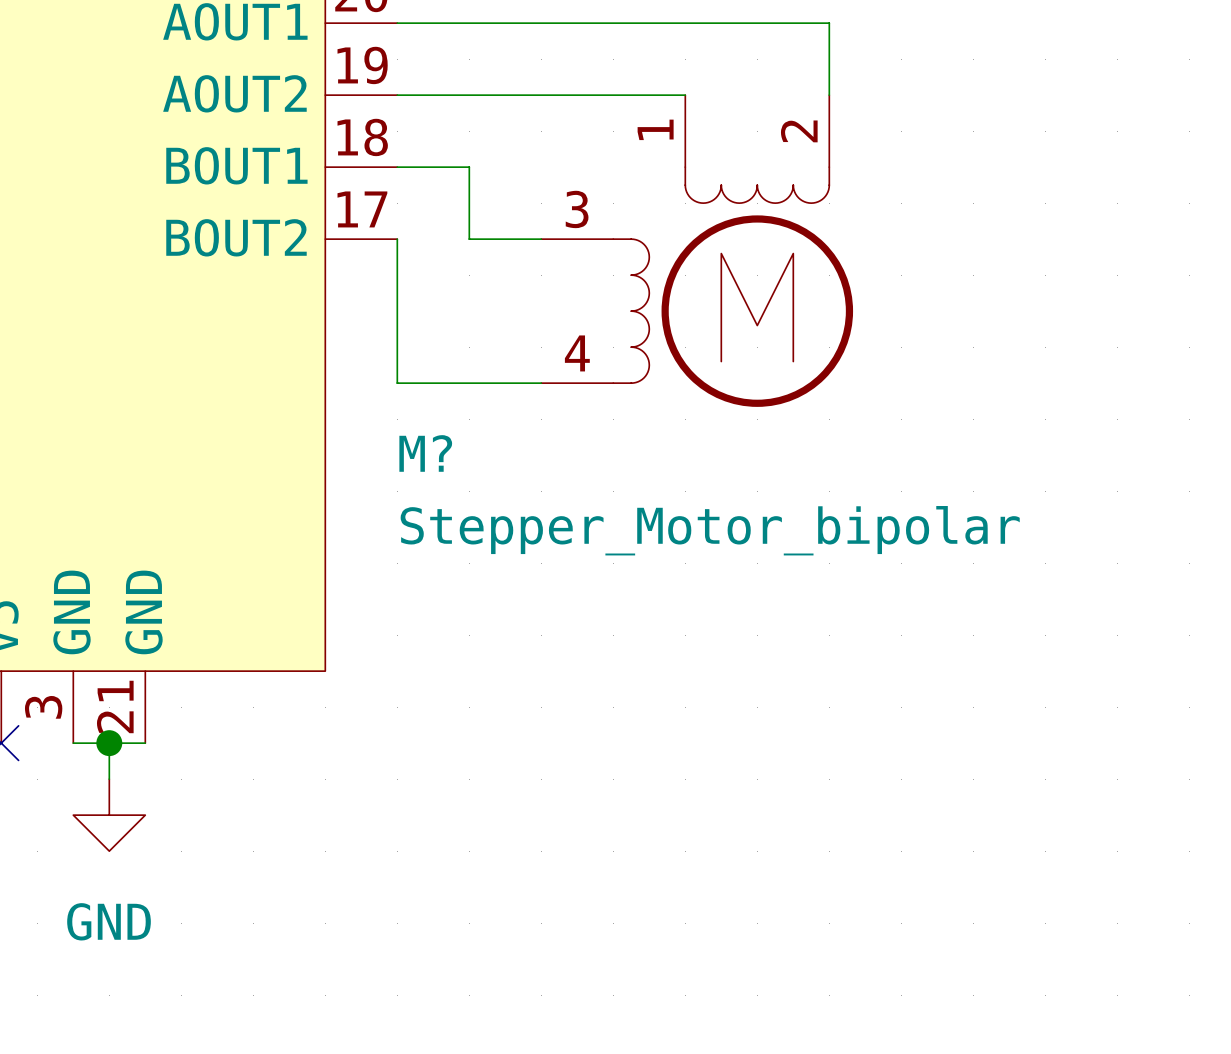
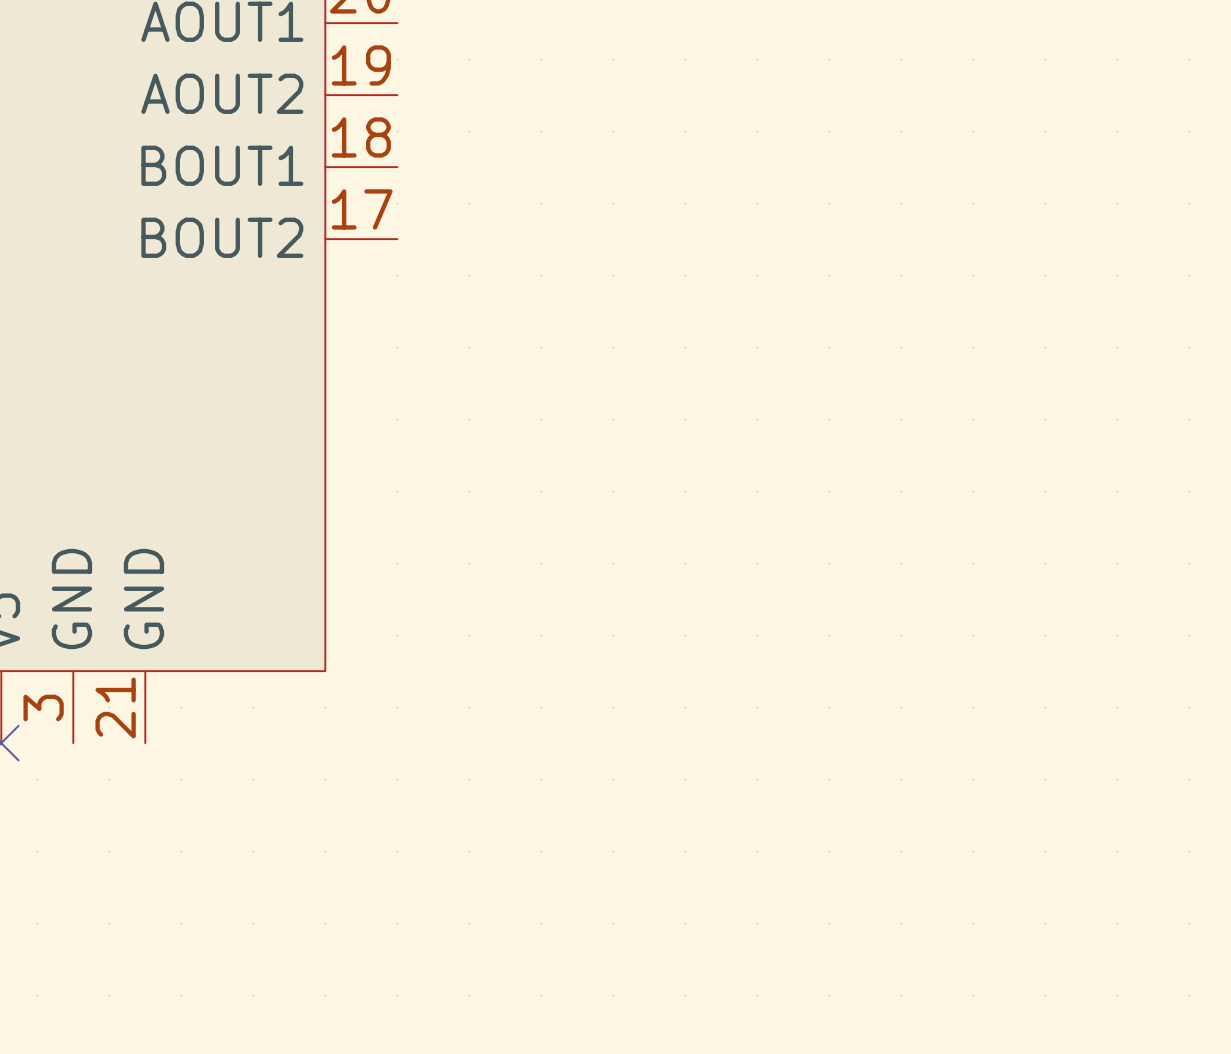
wire: (397, 23) (829, 23) (829, 95) -> none
wire: (397, 95) (685, 95) -> none
wire: (397, 167) (469, 167) (469, 239) (541, 239) -> none
wire: (397, 239) (397, 383) (541, 383) -> none
M?: Stepper_Motor_bipolar (697, 251) -> none
wire: (73, 743) (145, 743) -> none
wire: (109, 743) (109, 779) -> none
junction: (109, 743) -> none
power symbol: GND (109, 815) -> none

